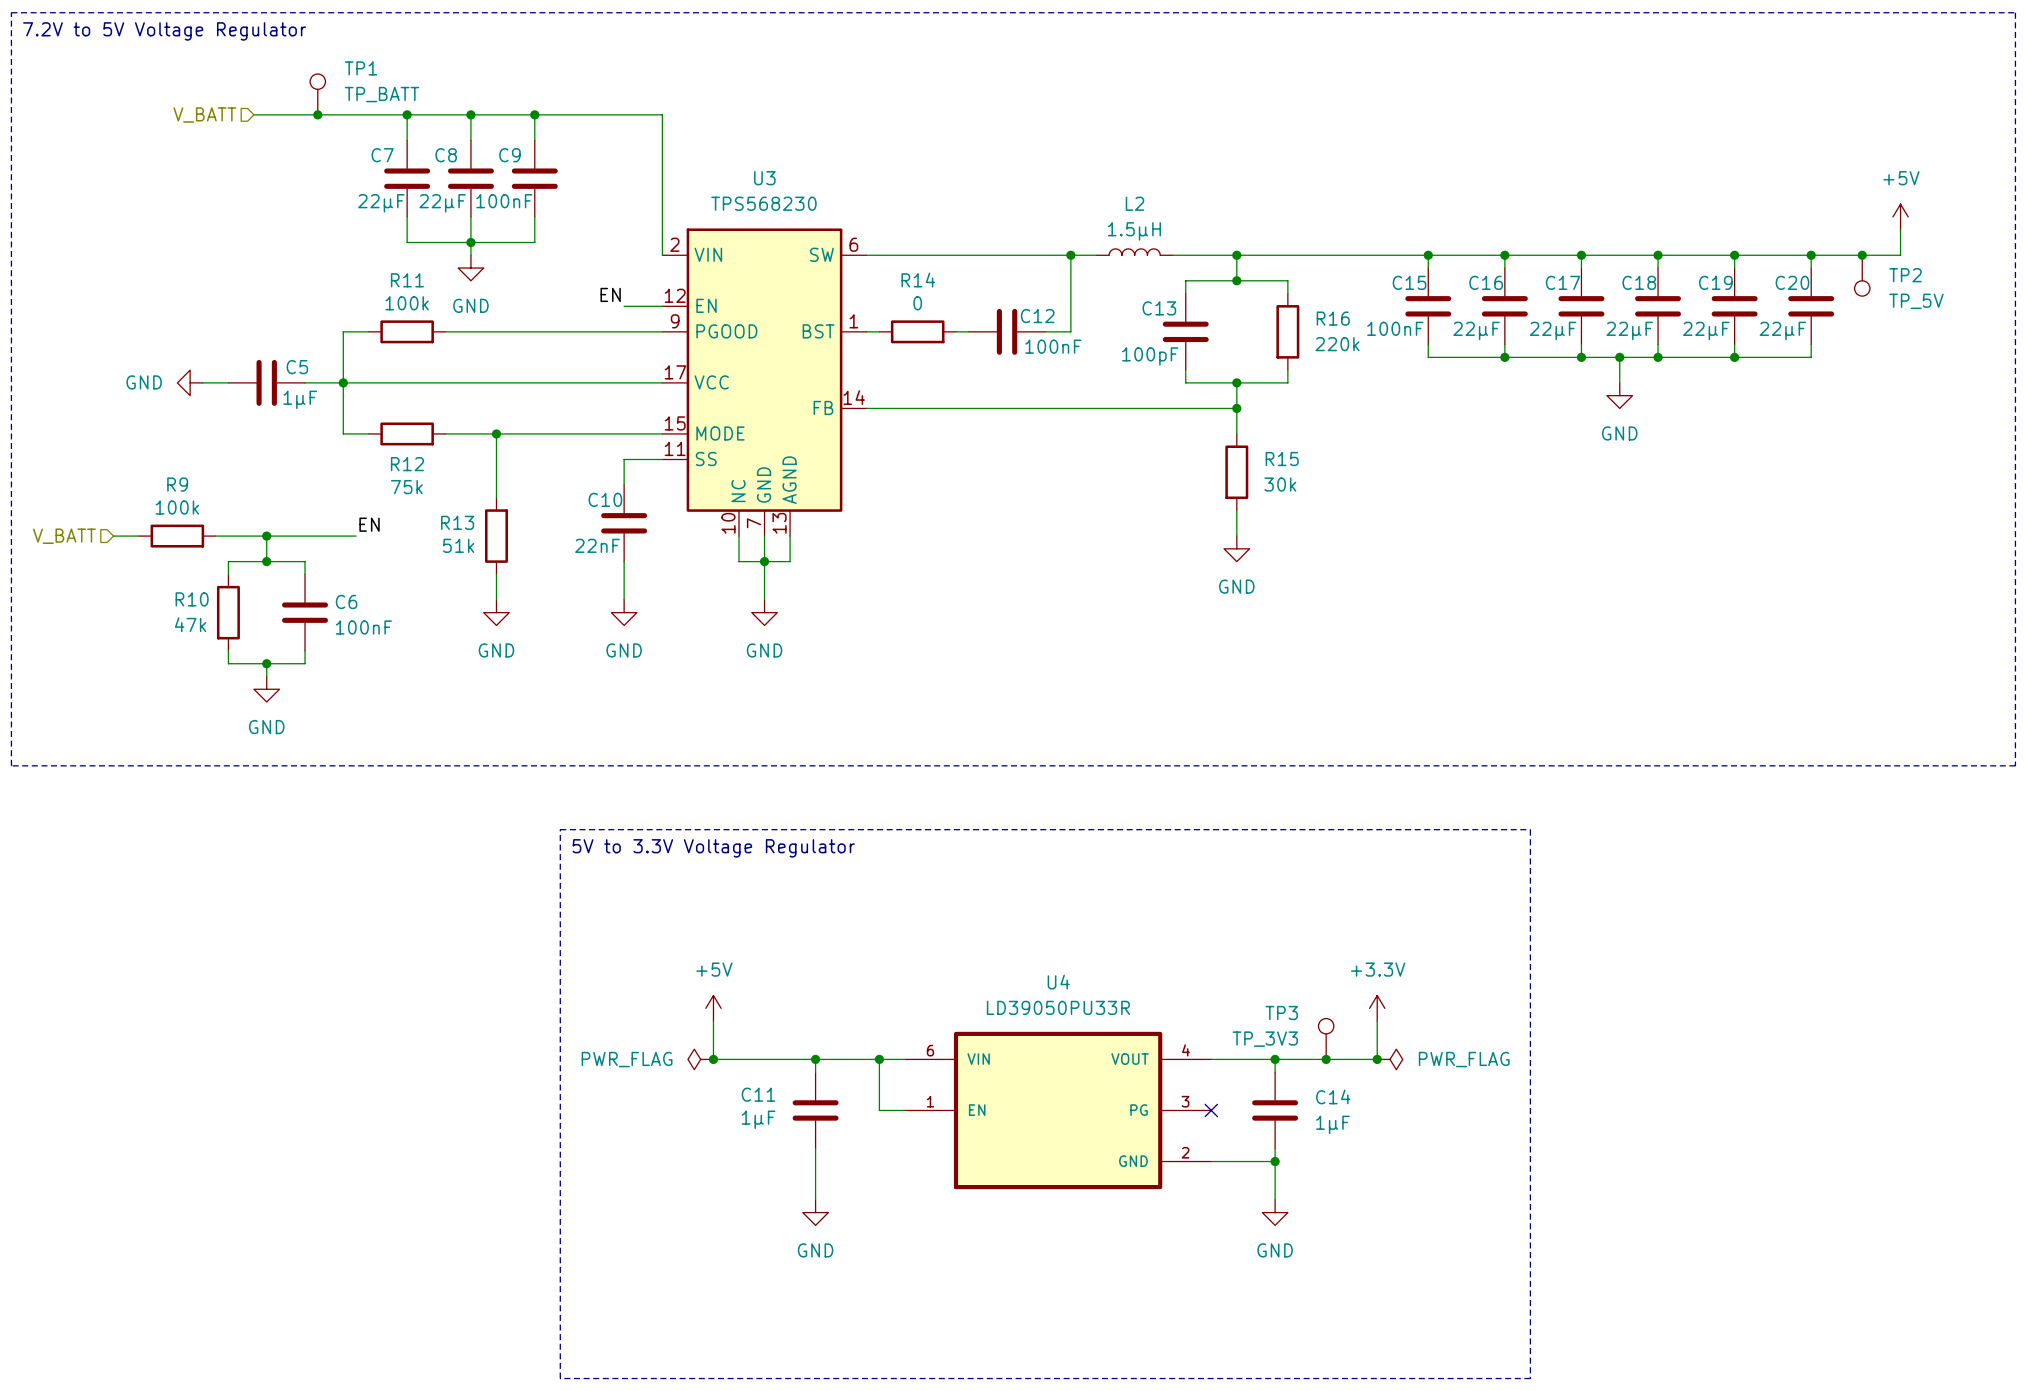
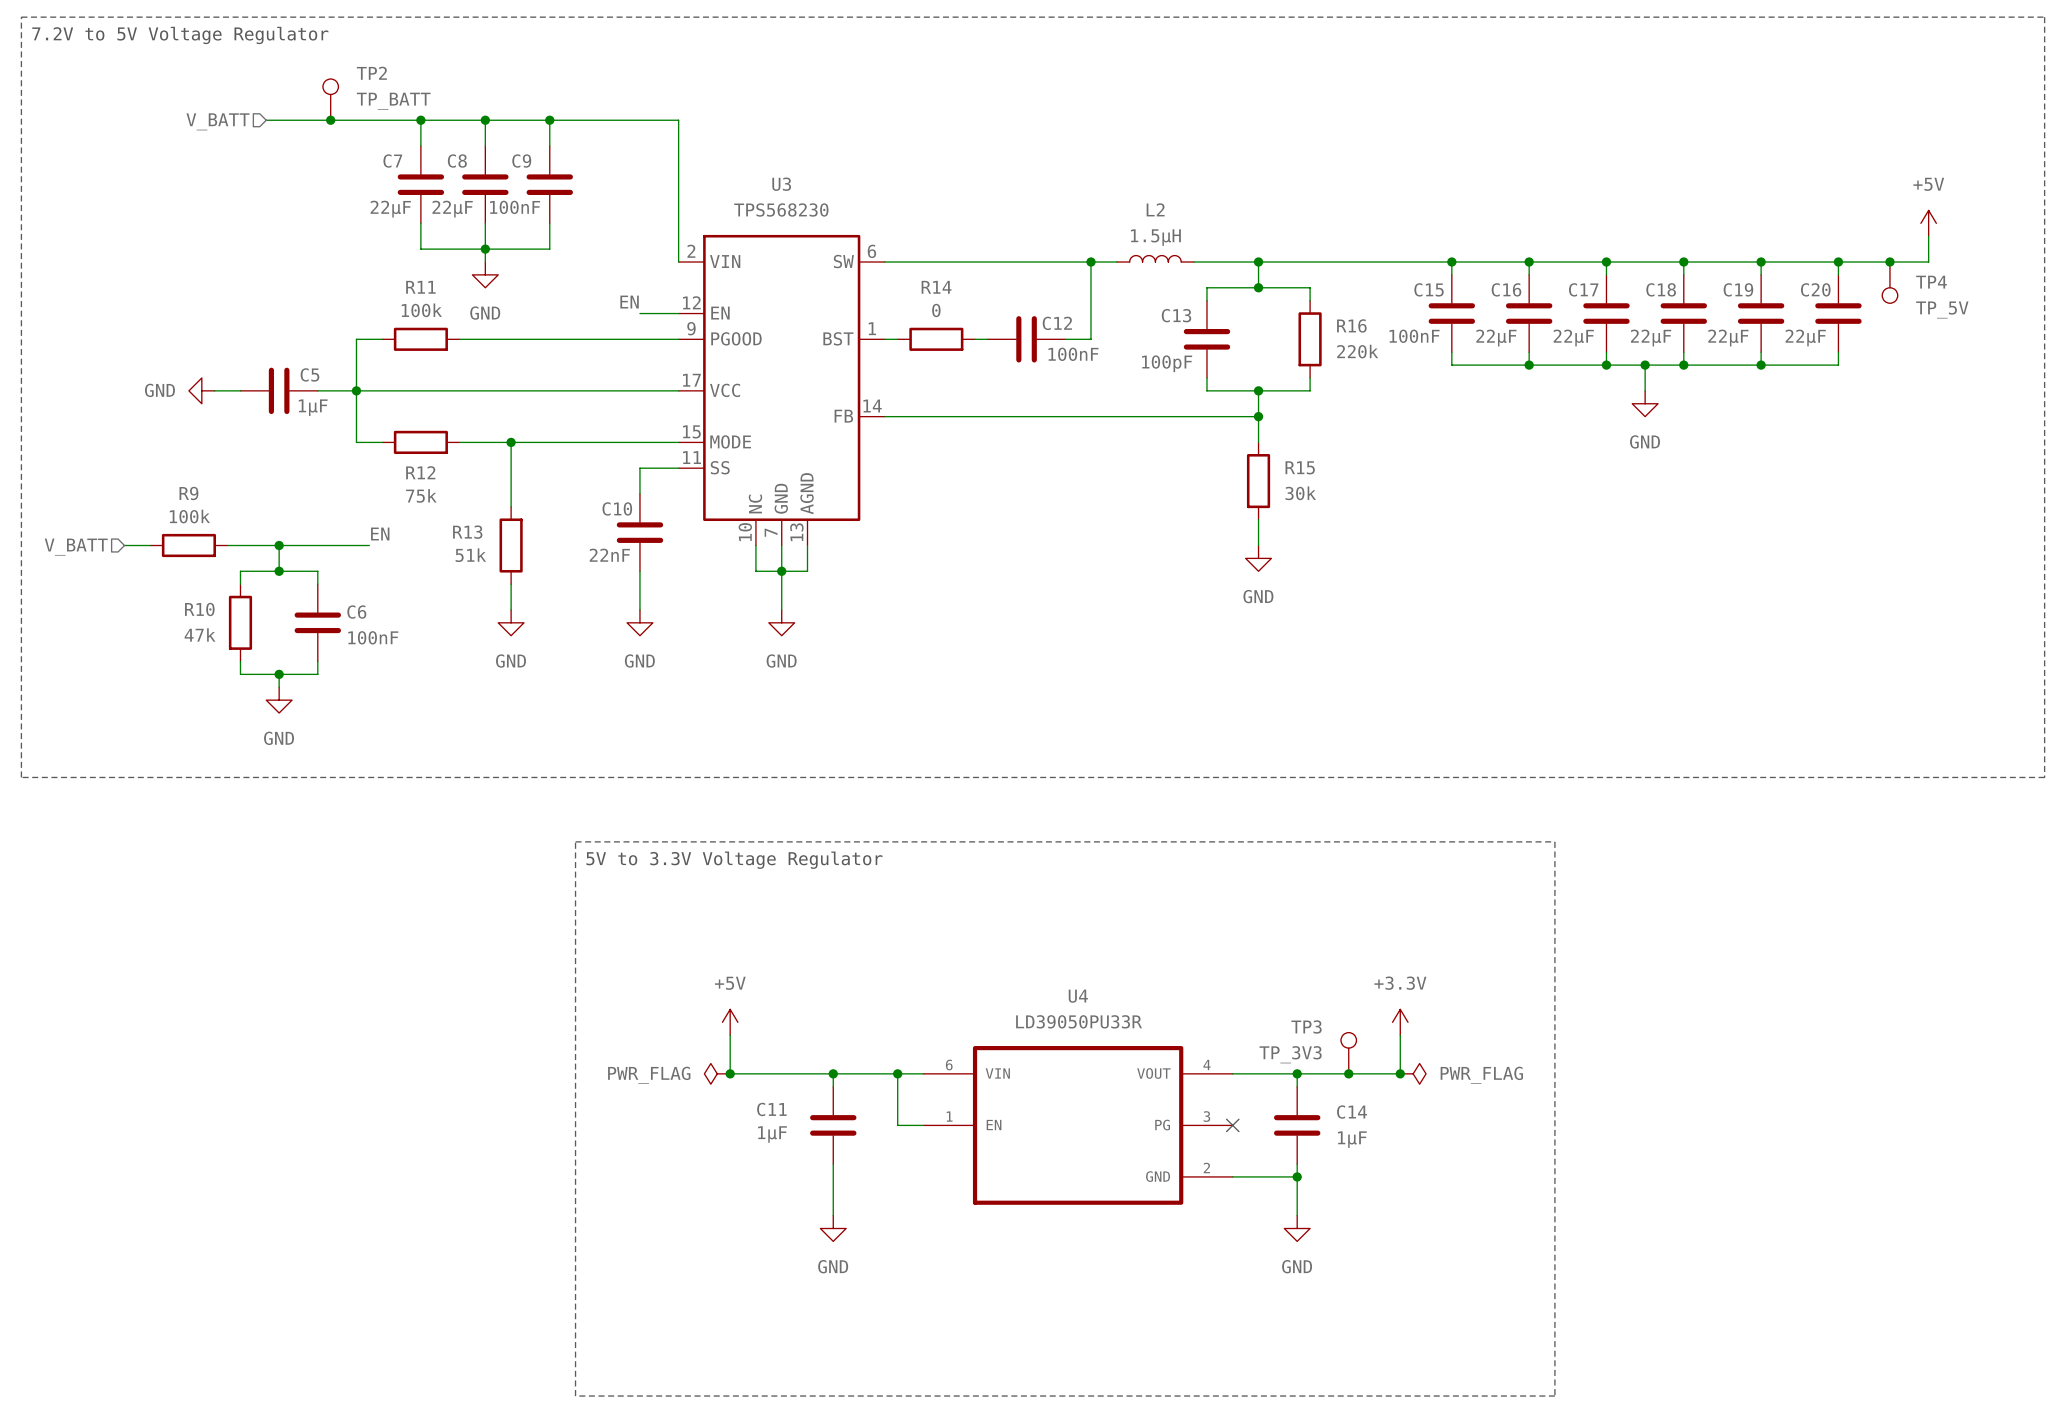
TP1 name: TP1 (361, 68) -> TP2 (371, 73)
TP2 name: TP2 (1905, 275) -> TP4 (1931, 282)

